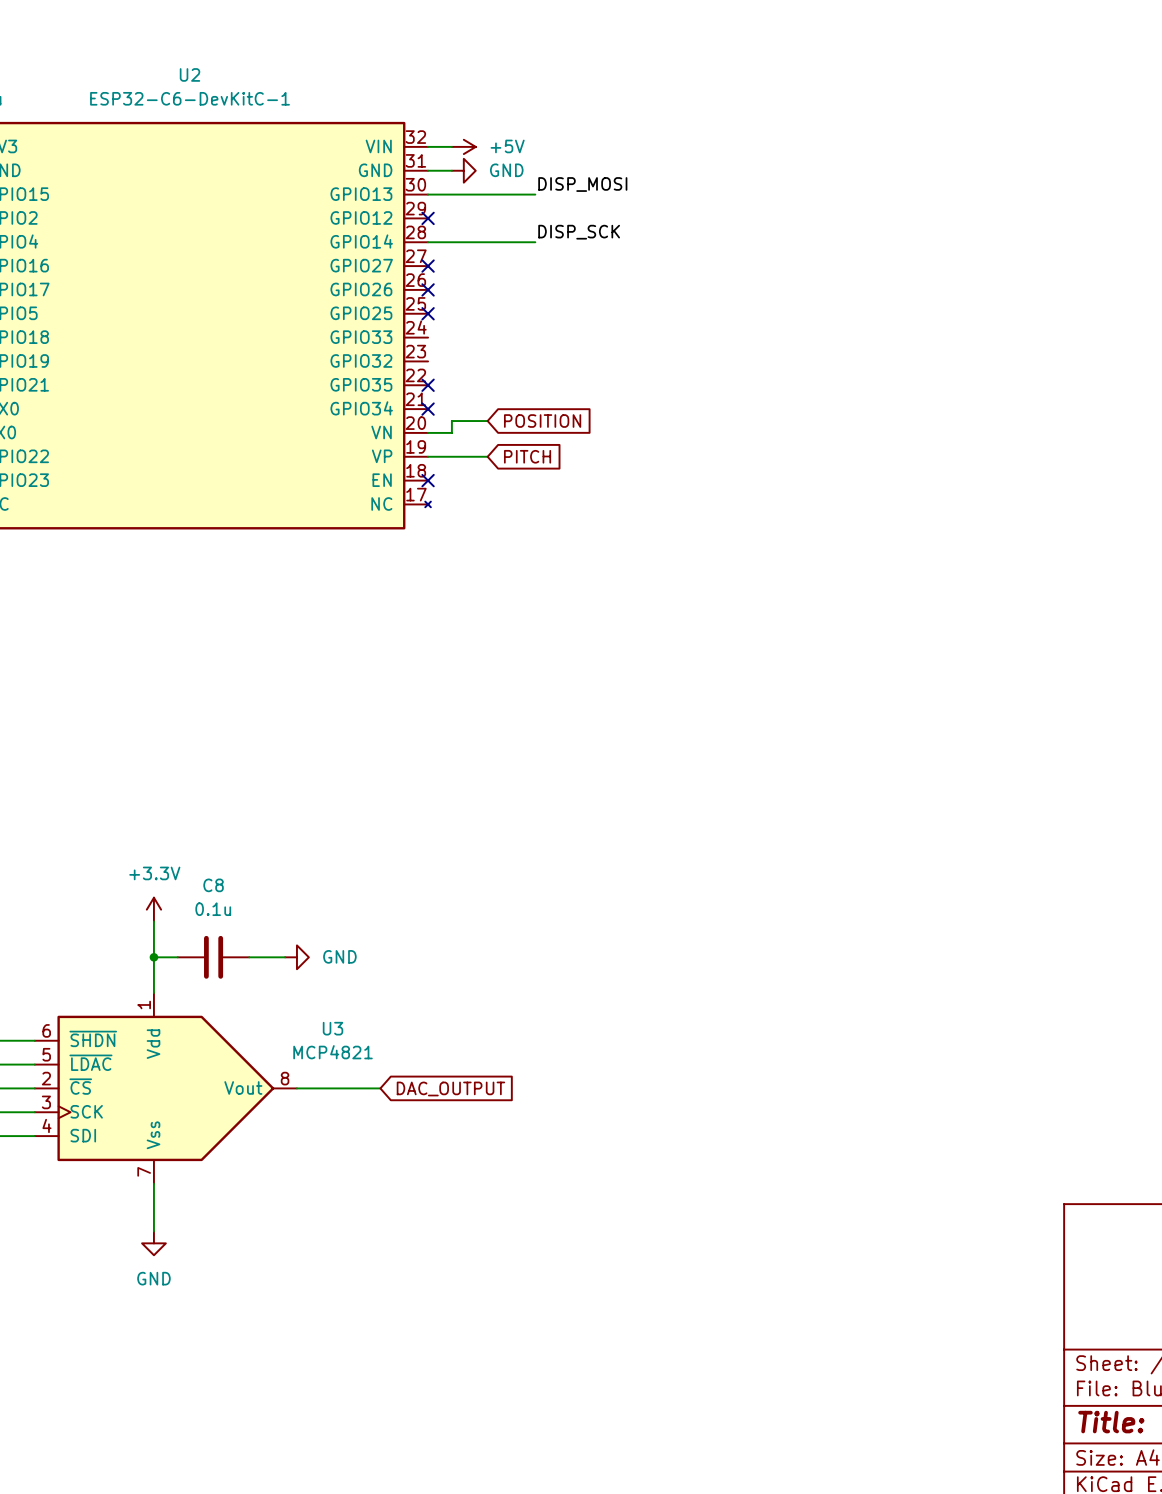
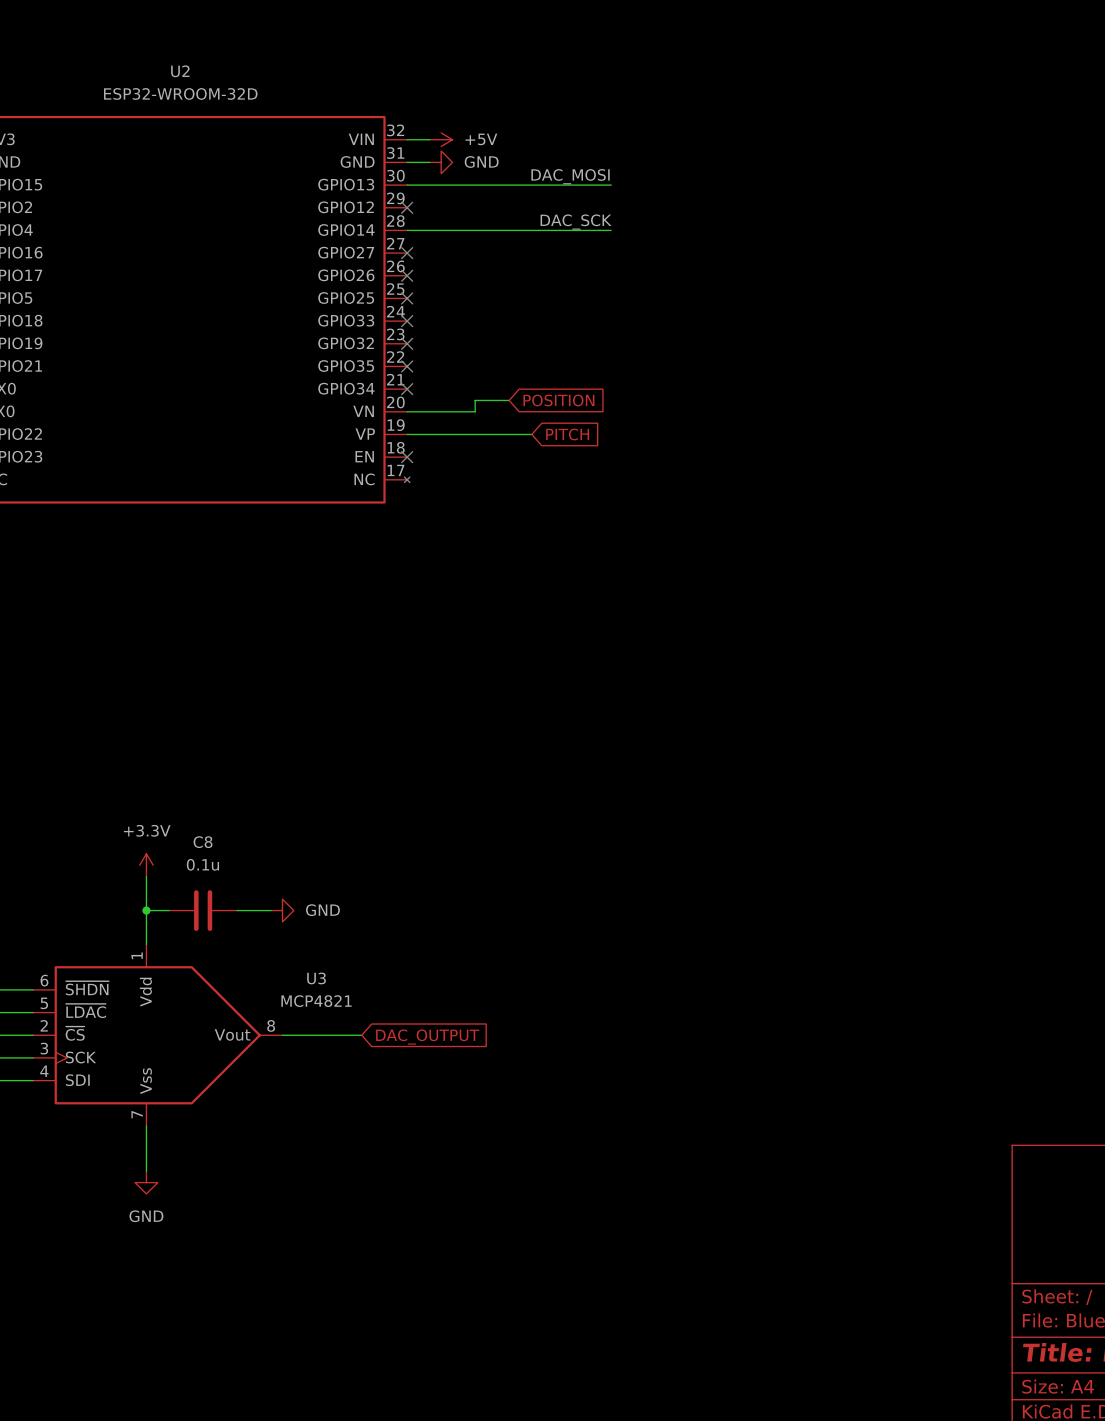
U2 value: ESP32-C6-DevKitC-1 (190, 98) -> ESP32-WROOM-32D (180, 93)
label: DISP_MOSI (582, 184) -> DAC_MOSI (570, 176)
wire: none -> (509, 185) (611, 185)
label: DISP_SCK (579, 232) -> DAC_SCK (576, 222)
wire: none -> (509, 230) (611, 230)
no-connect mark: none -> (407, 321)
no-connect mark: none -> (407, 343)
wire: (487, 421) (451, 421) (451, 432) -> (509, 400) (475, 400) (475, 411) (429, 411)
global label position: POSITION (542, 421) -> POSITION (558, 400)
wire: none -> (463, 434) (531, 434)
global label position: PITCH (527, 456) -> PITCH (567, 434)

